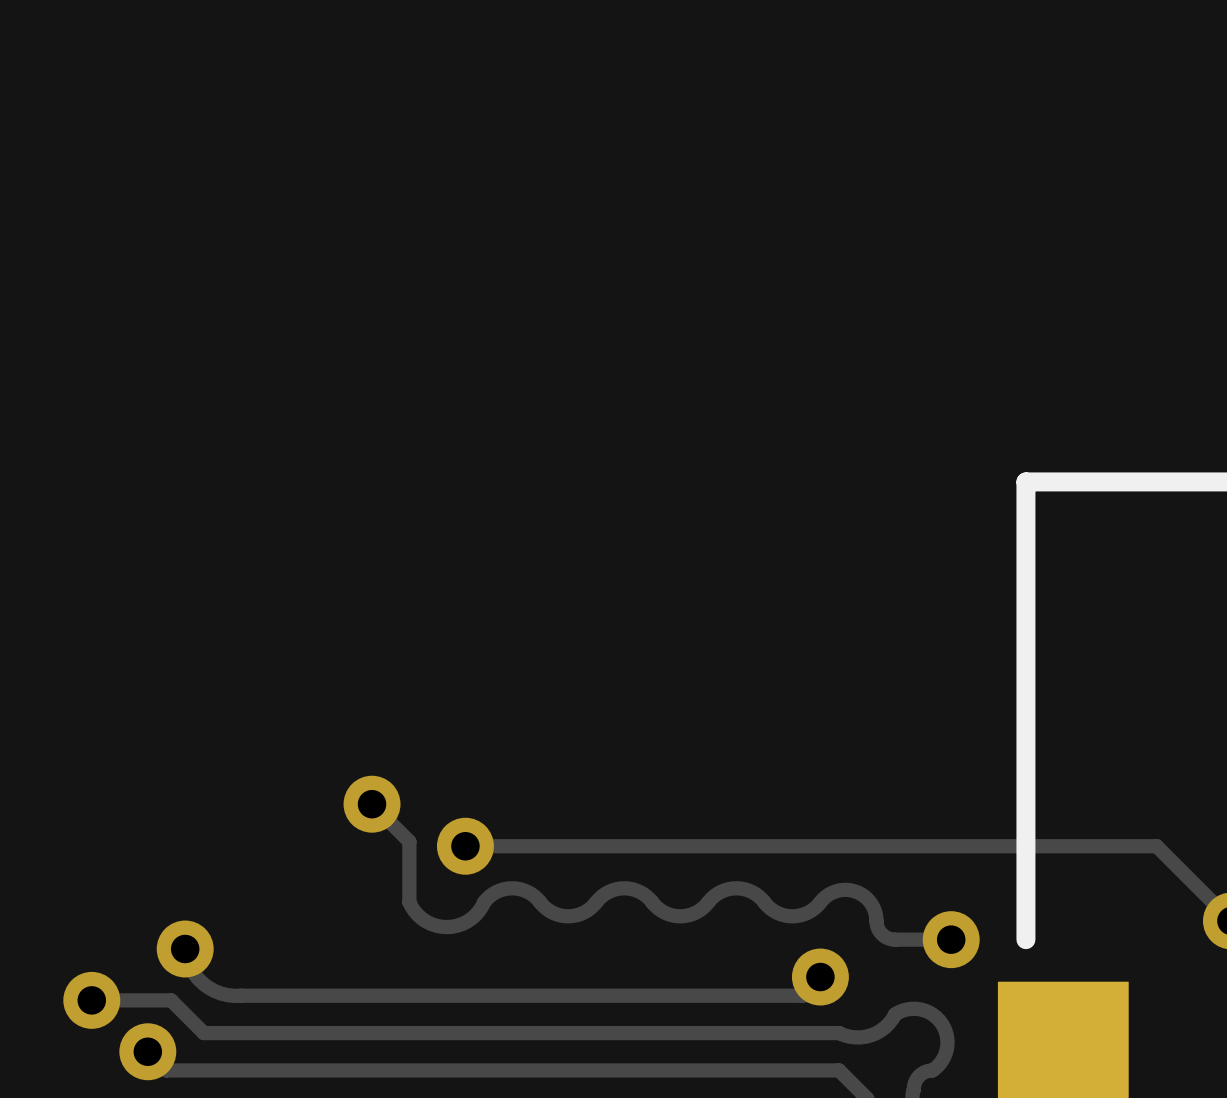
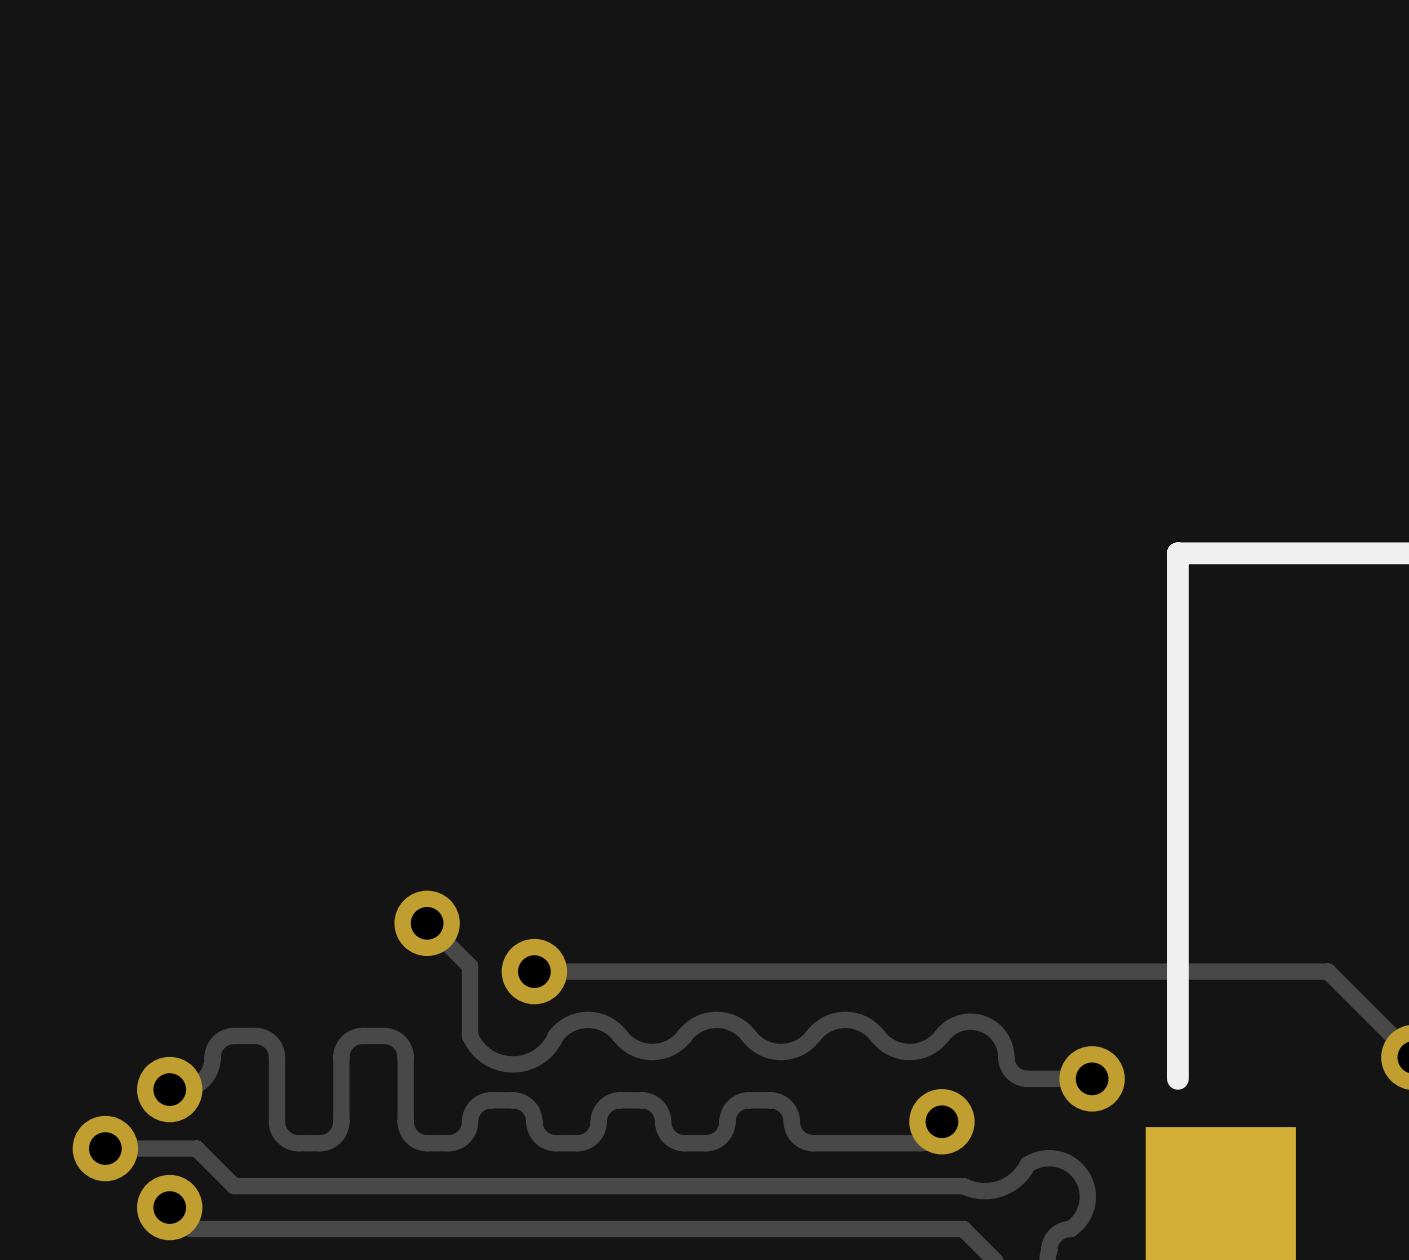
track: (185, 949) (190, 968) (198, 979) (209, 987) (227, 995) (259, 995) -> (169, 1089) (188, 1088) (203, 1080) (210, 1069) (214, 1049) (223, 1038) (234, 1035) (263, 1037) (272, 1044) (276, 1054) (277, 1127) (285, 1138) (298, 1143)
via position: (185, 949) -> (169, 1089)
track: (372, 995) (278, 995) -> (427, 1143) (414, 1138) (406, 1127) (404, 1049) (397, 1040) (384, 1035) (357, 1036) (349, 1040) (344, 1046) (341, 1057) (340, 1127) (332, 1138) (319, 1143)
track: (484, 995) (390, 995) -> (555, 1143) (545, 1140) (538, 1134) (535, 1127) (532, 1113) (528, 1106) (521, 1101) (512, 1100) (488, 1100) (480, 1103) (471, 1113) (469, 1127) (465, 1134) (456, 1141) (448, 1143)
track: (596, 995) (502, 995) -> (684, 1143) (673, 1140) (667, 1134) (663, 1127) (661, 1113) (656, 1106) (649, 1101) (641, 1100) (617, 1100) (609, 1103) (600, 1113) (598, 1127) (594, 1134) (585, 1141) (577, 1143)
track: (708, 995) (614, 995) -> (813, 1143) (805, 1141) (798, 1136) (793, 1129) (791, 1116) (787, 1108) (778, 1101) (770, 1100) (746, 1100) (738, 1103) (729, 1113) (726, 1127) (723, 1134) (714, 1141) (705, 1143)

